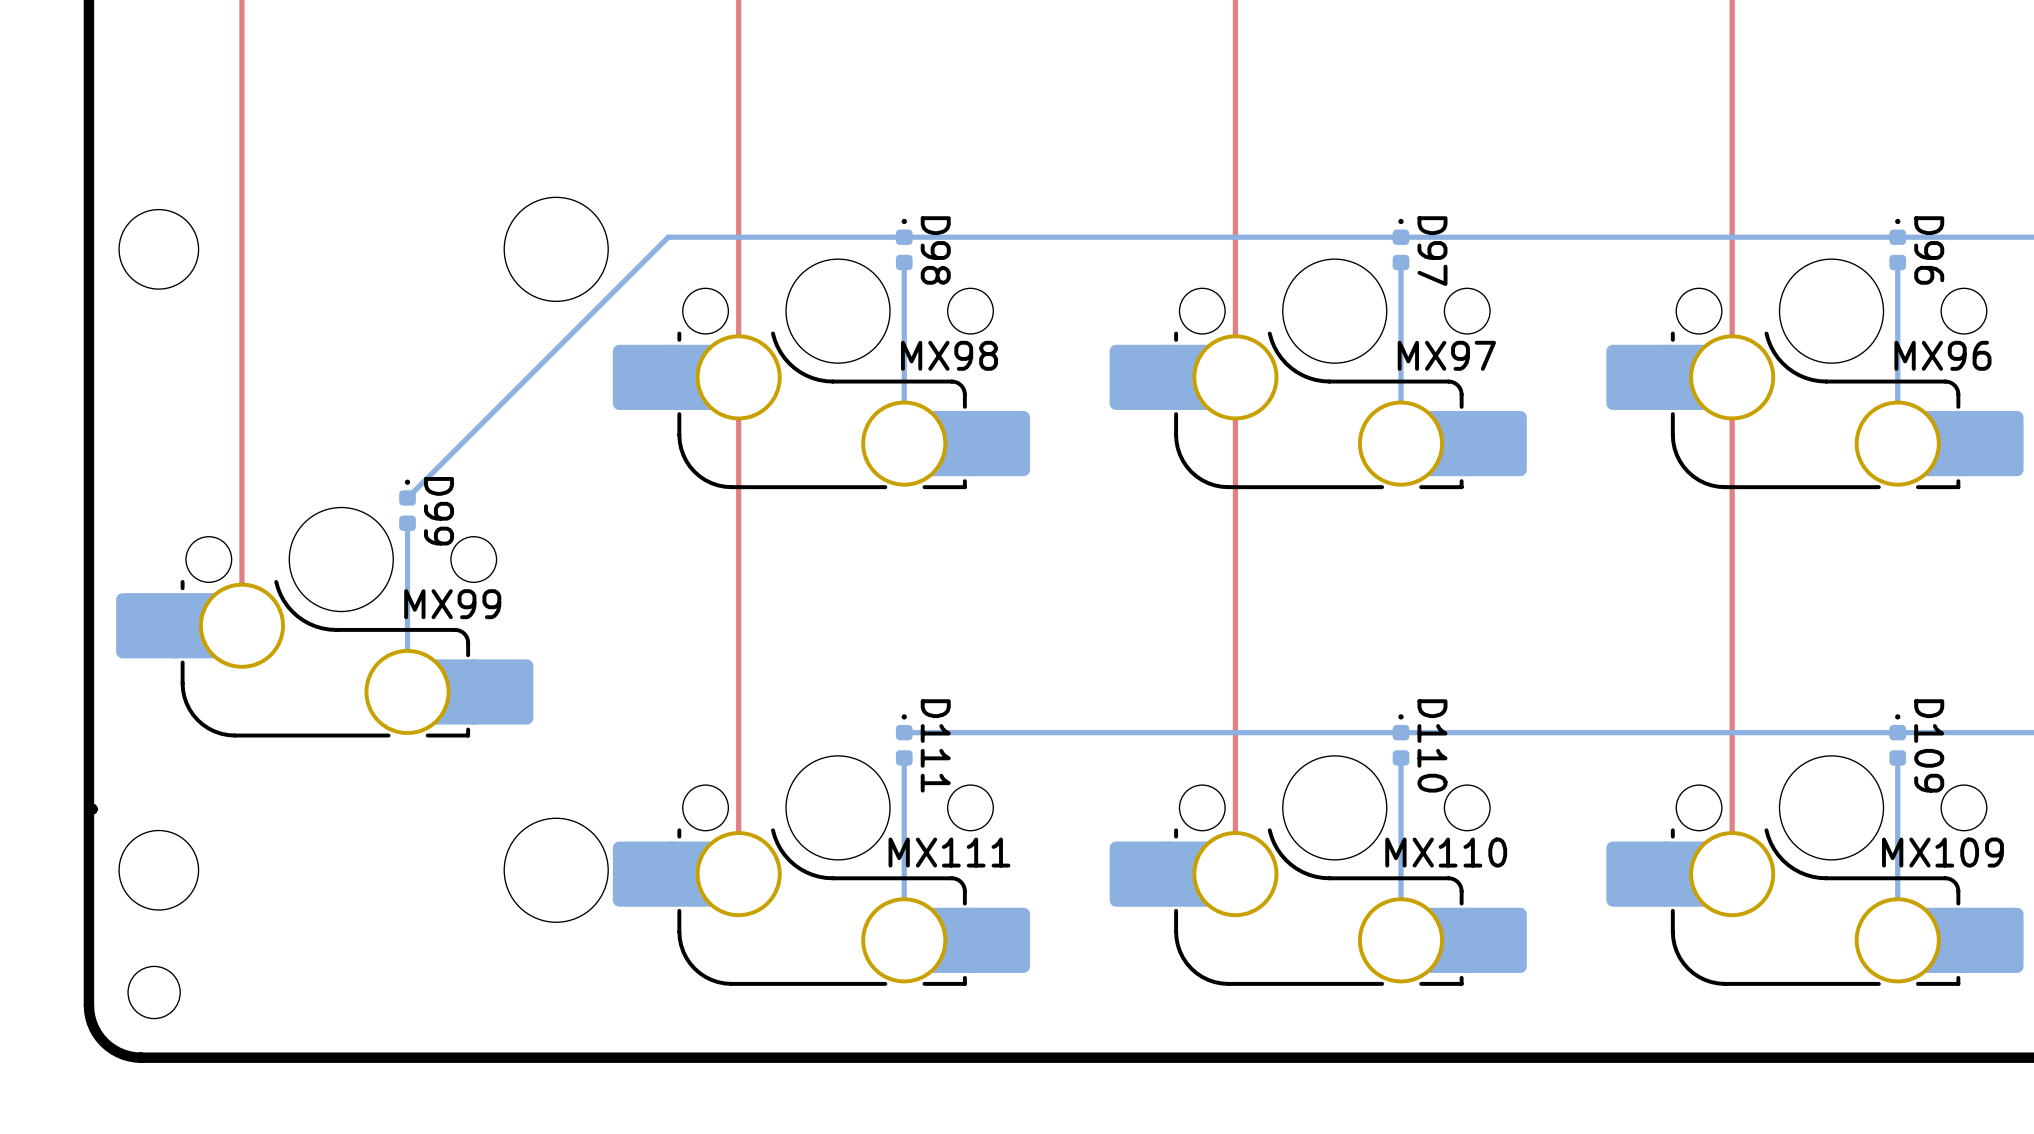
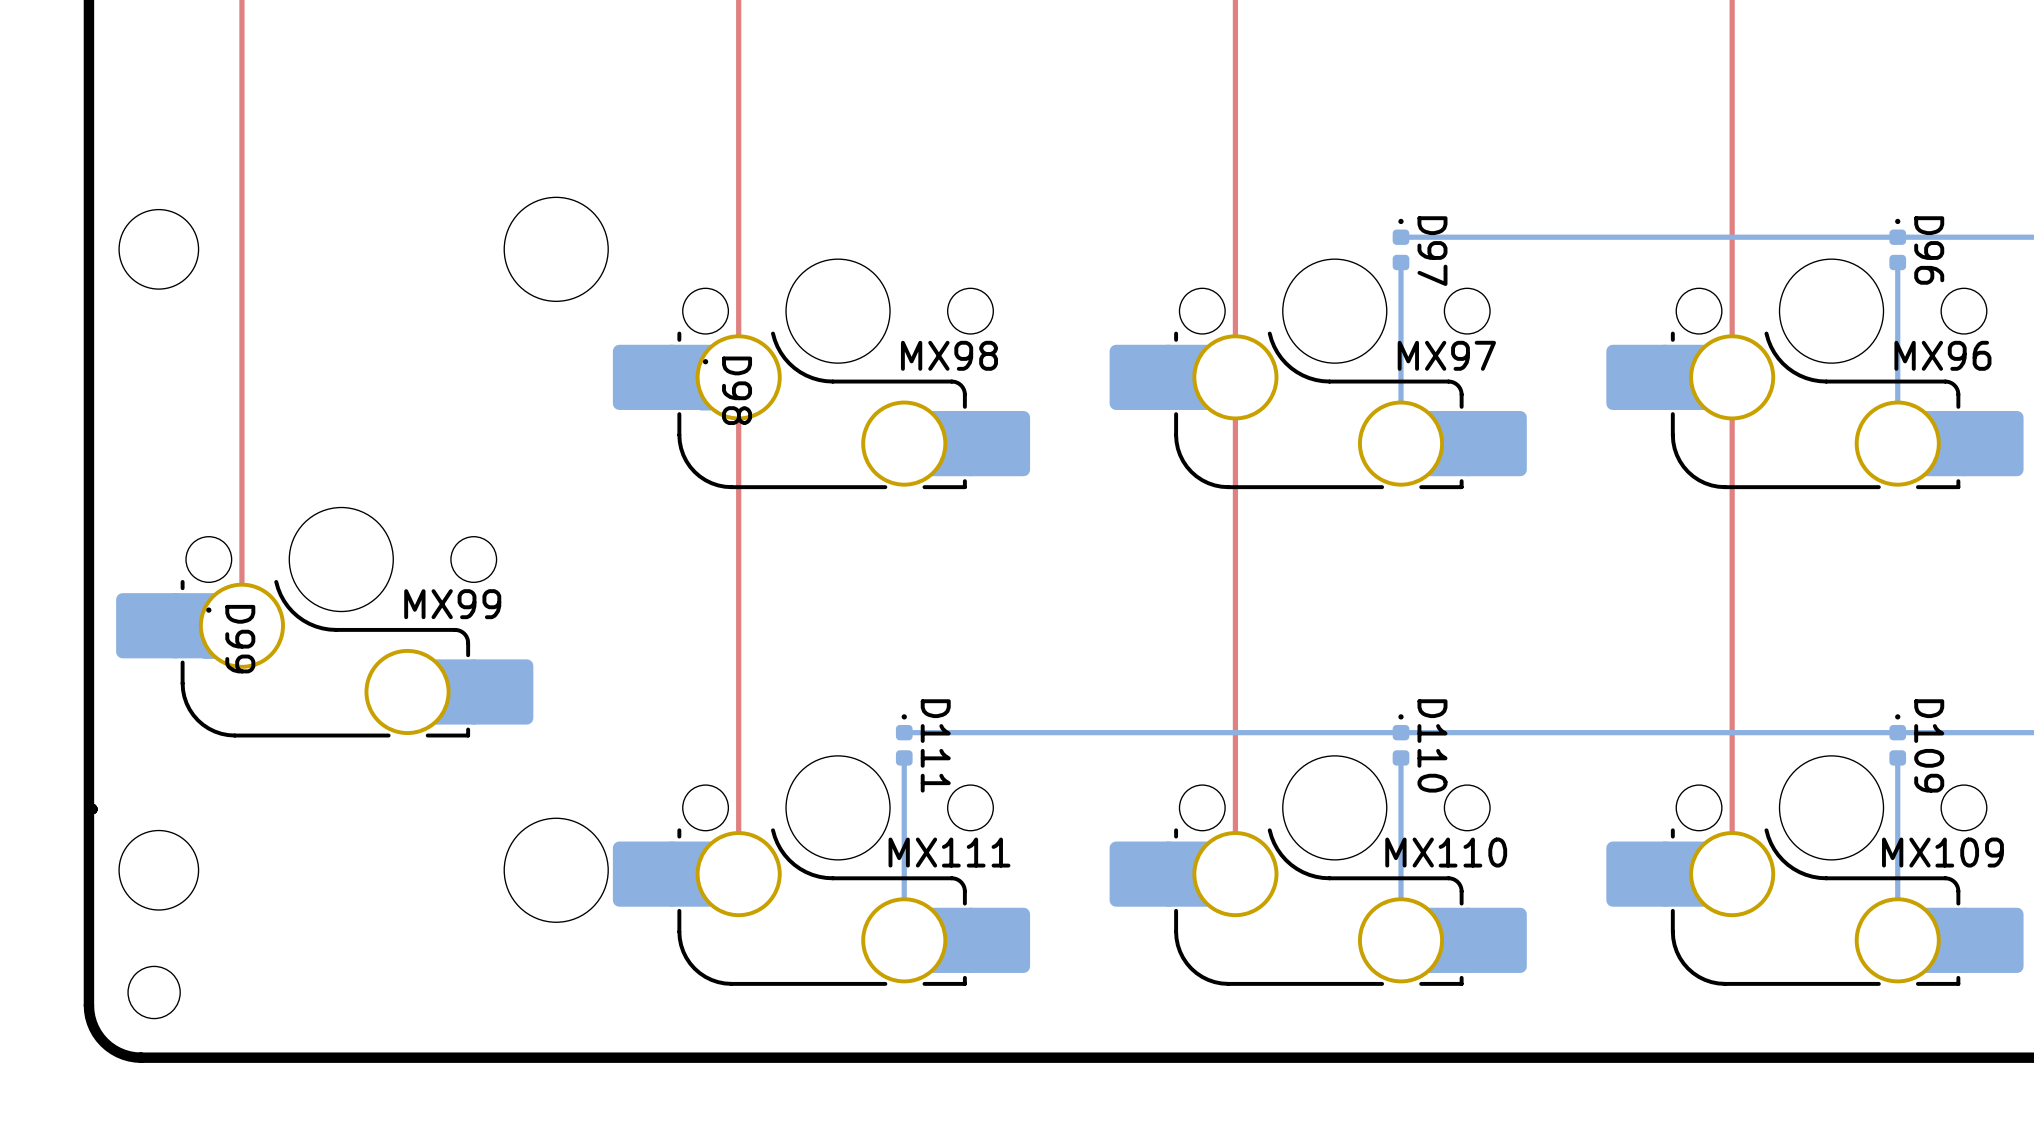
bottom track: (1401, 237) (668, 237) (407, 497) -> none
D98 position: (904, 244) -> (705, 384)
bottom track: (904, 262) (904, 443) -> none
D99 position: (407, 505) -> (208, 633)
bottom track: (407, 523) (407, 691) -> none

